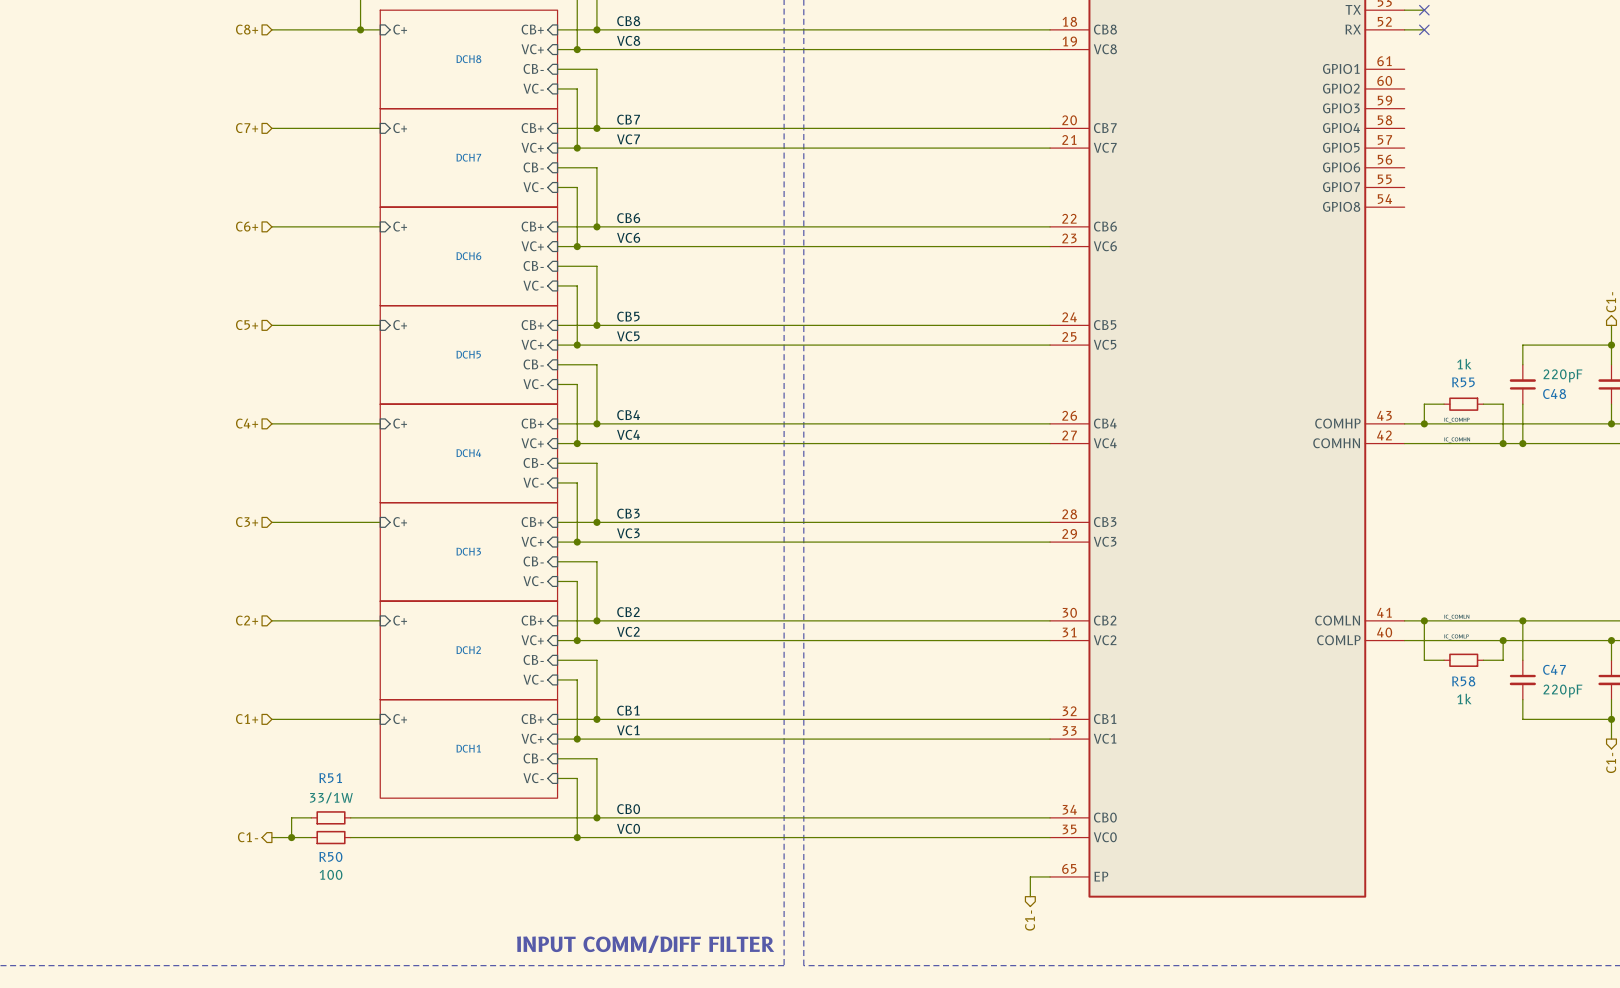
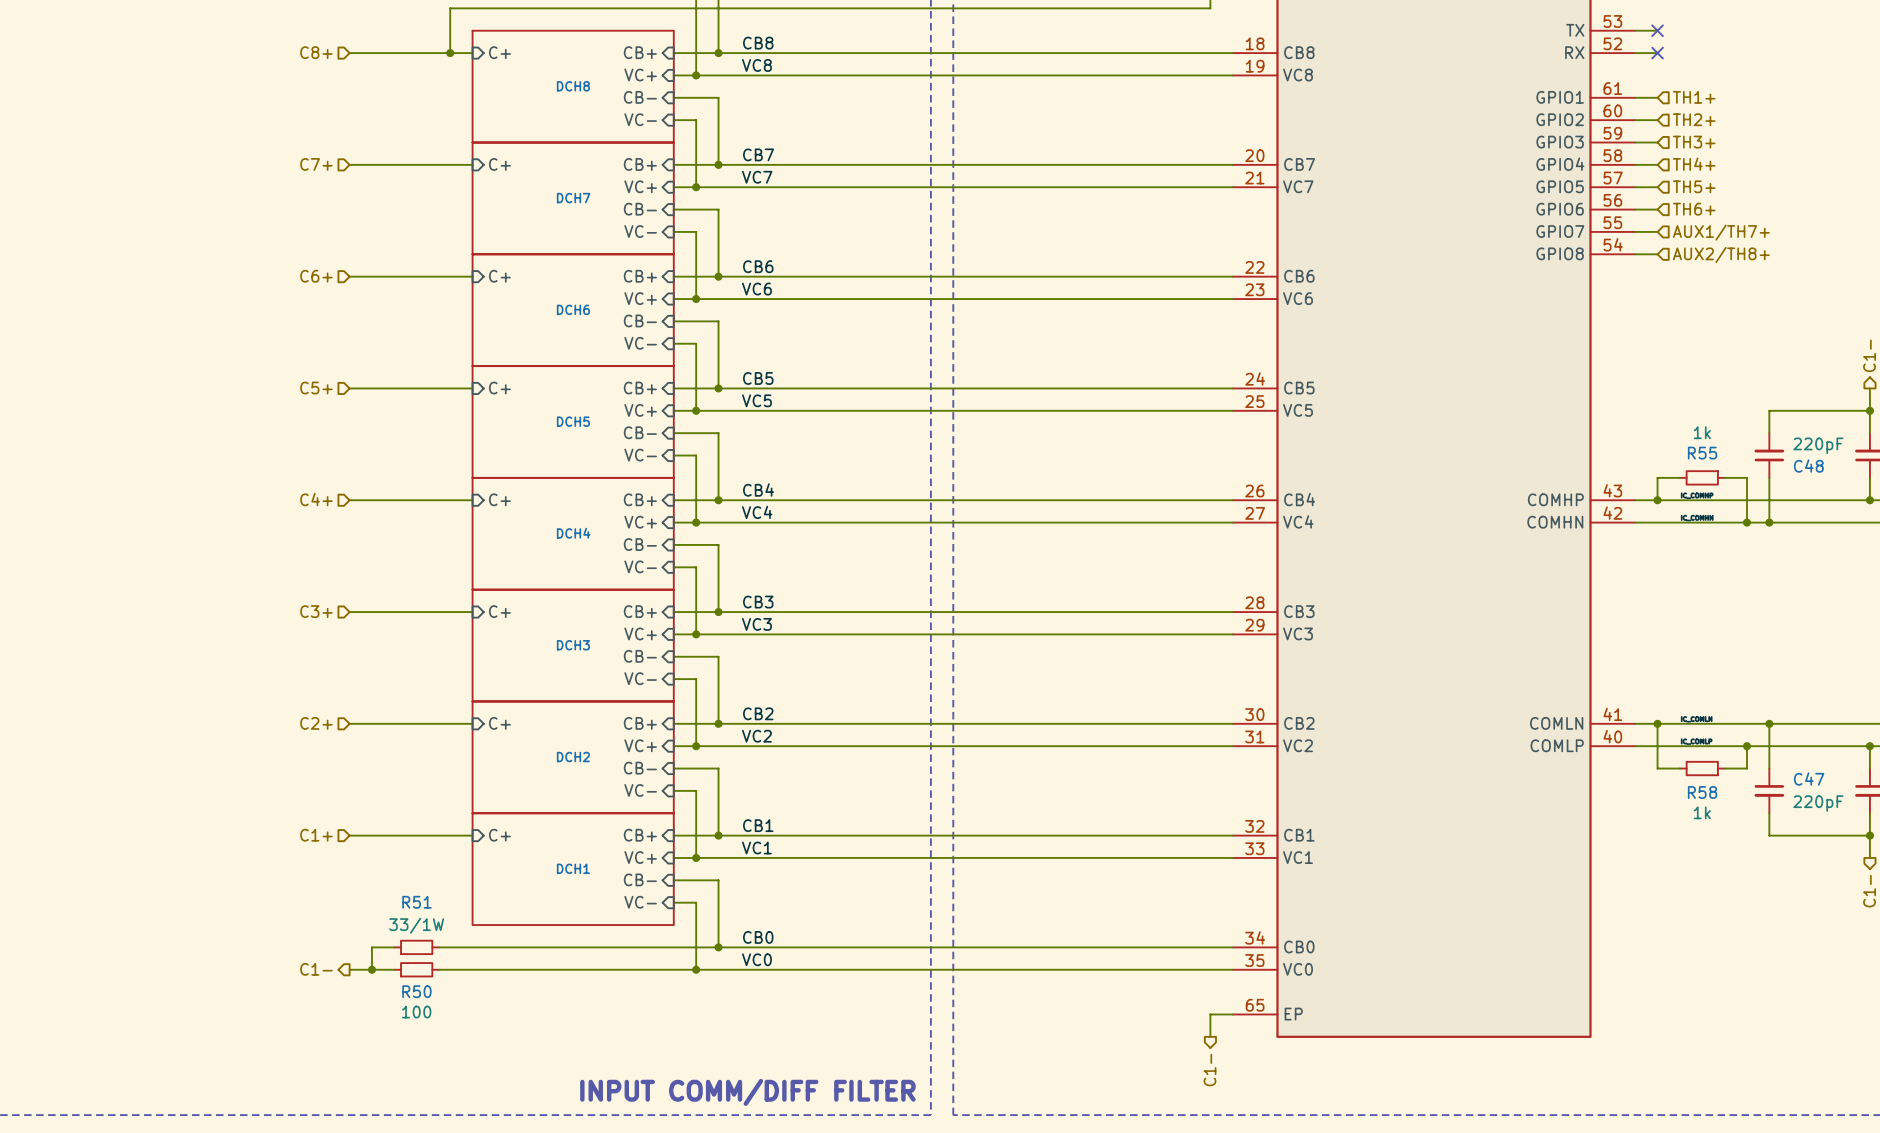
hierarchical label: none -> TH1+ (1694, 97)
wire: none -> (1635, 97) (1657, 97)
wire: none -> (1635, 120) (1657, 120)
hierarchical label: none -> TH2+ (1694, 119)
wire: none -> (1635, 142) (1657, 142)
hierarchical label: none -> TH3+ (1694, 142)
wire: none -> (1635, 164) (1657, 164)
hierarchical label: none -> TH4+ (1694, 164)
hierarchical label: none -> TH5+ (1694, 186)
wire: none -> (1635, 187) (1657, 187)
wire: none -> (1635, 209) (1657, 209)
hierarchical label: none -> TH6+ (1694, 209)
wire: none -> (1635, 231) (1657, 231)
hierarchical label: none -> AUX1/TH7+ (1721, 232)
hierarchical label: none -> AUX2/TH8+ (1721, 254)
wire: none -> (1635, 254) (1657, 254)

